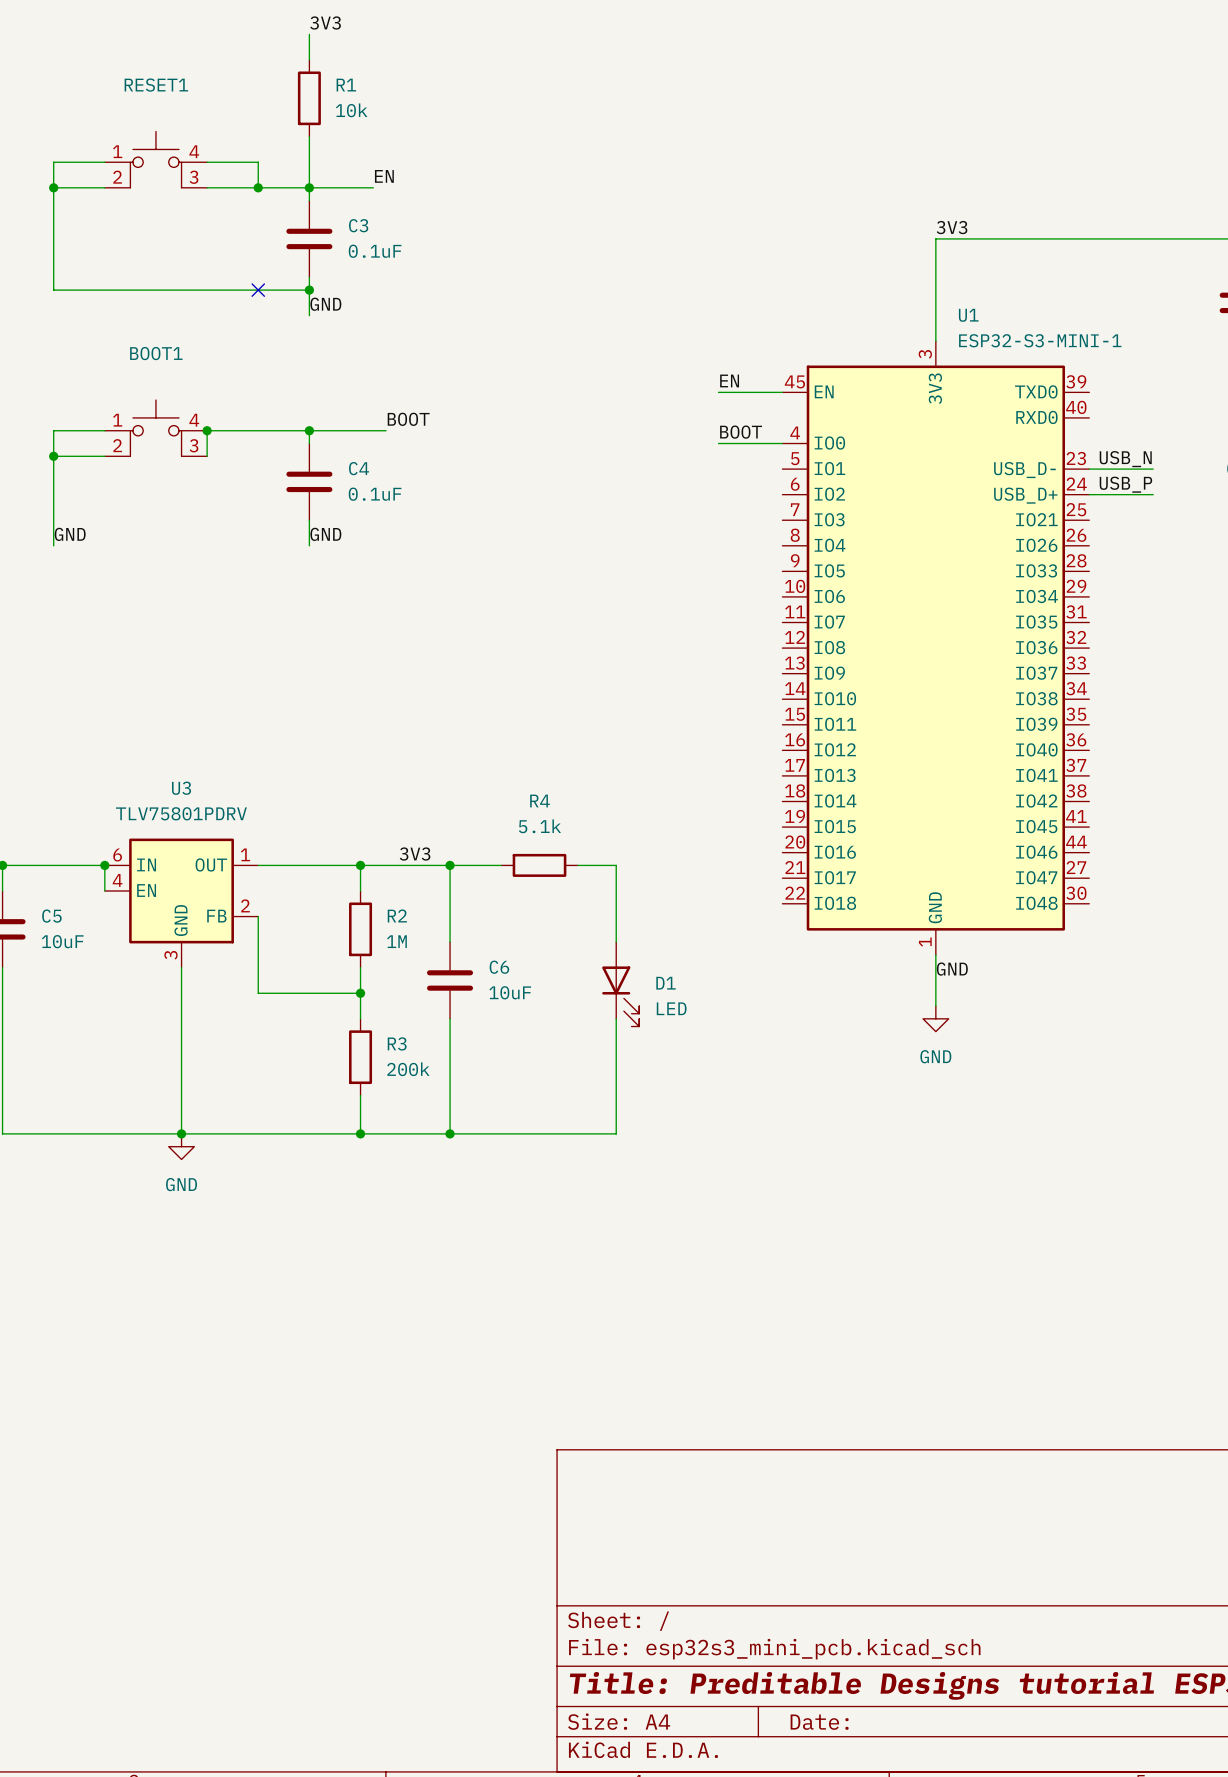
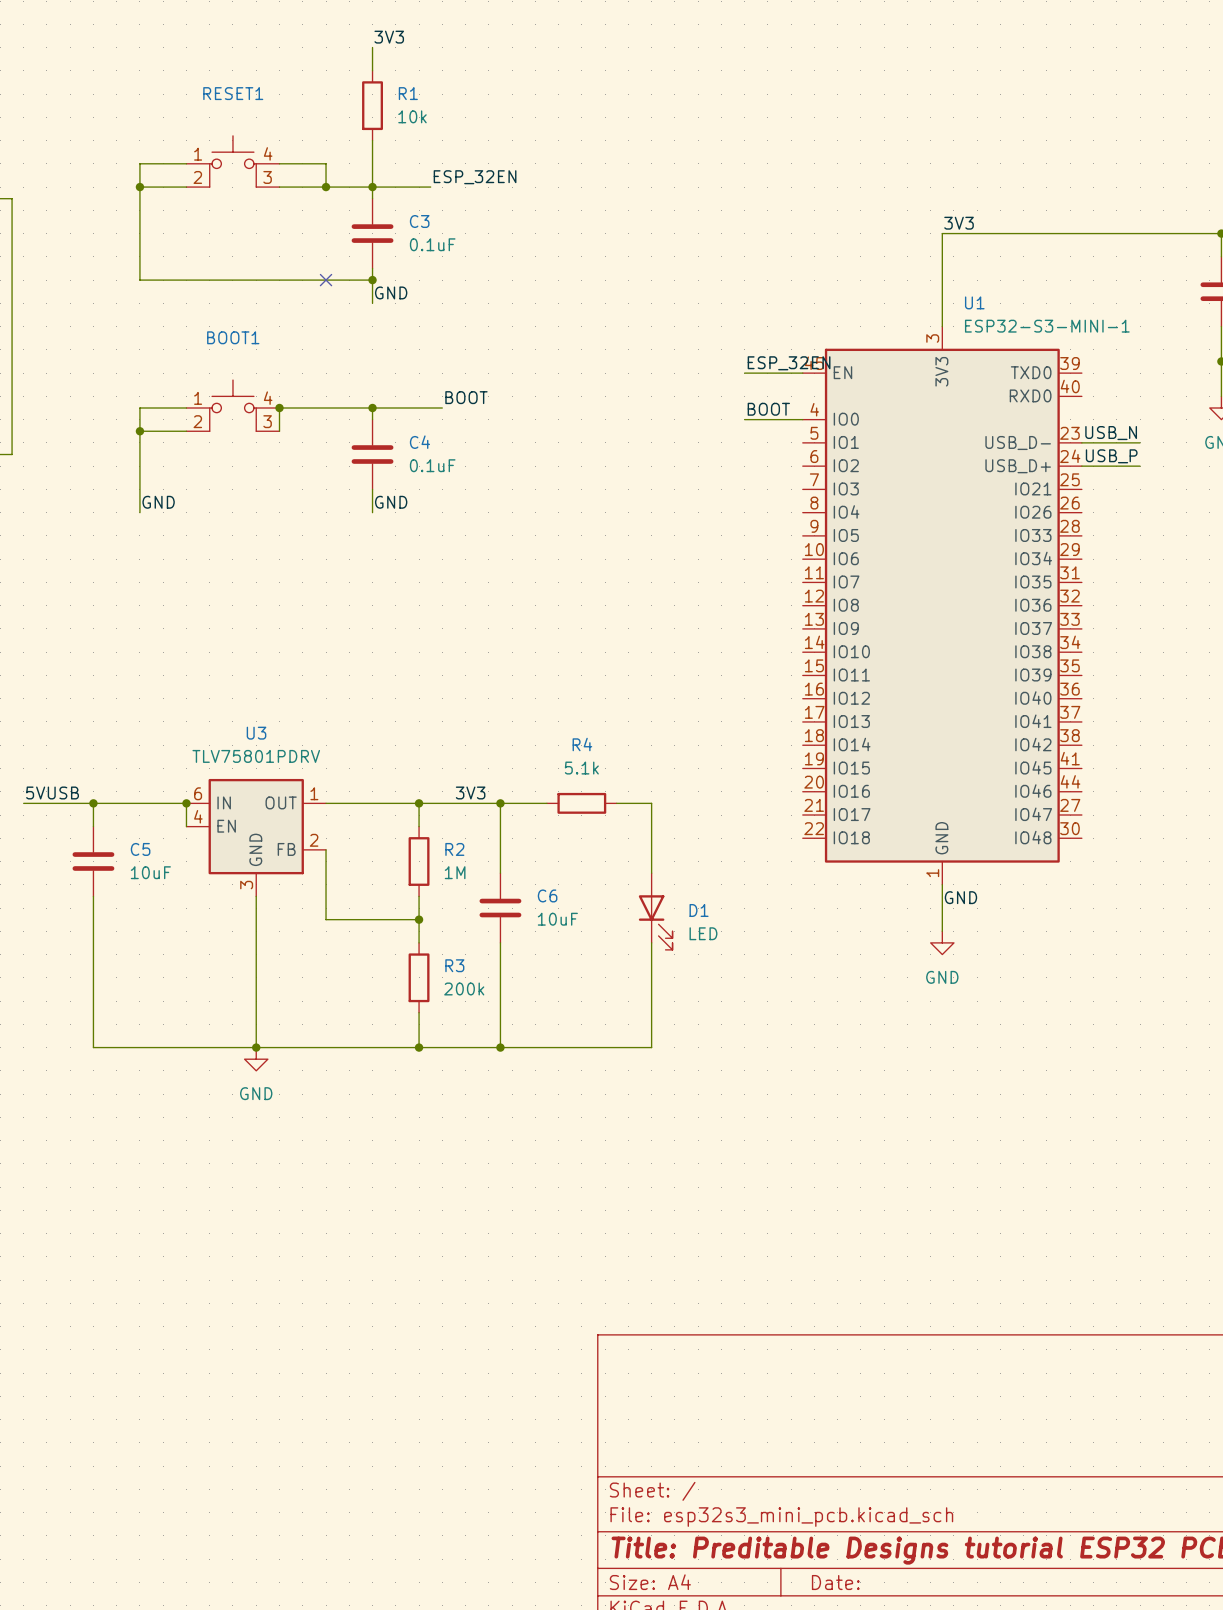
label: EN (384, 176) -> ESP_32EN (475, 177)
label: EN (729, 380) -> ESP_32EN (789, 363)

